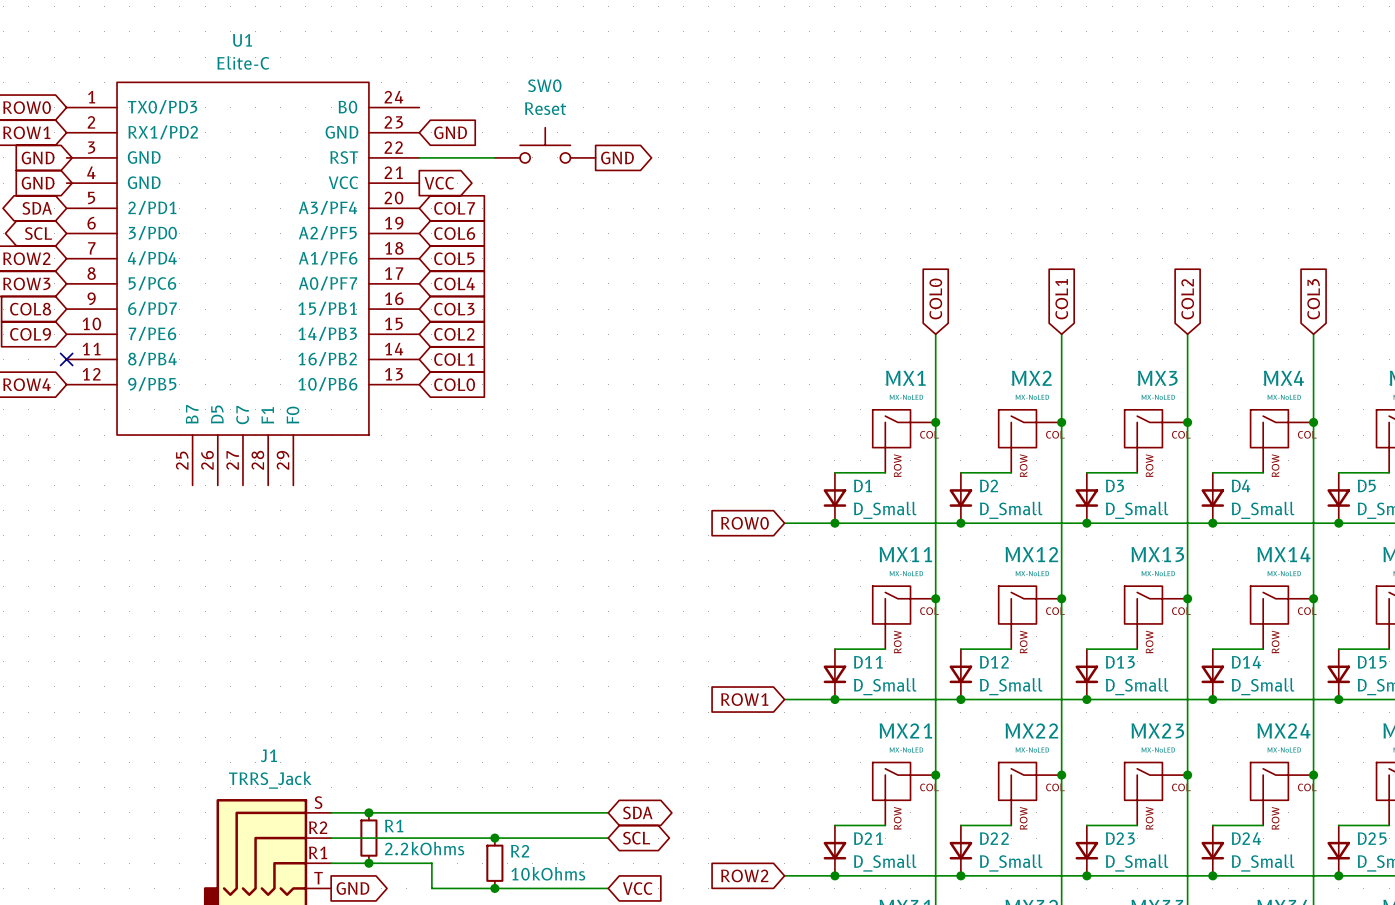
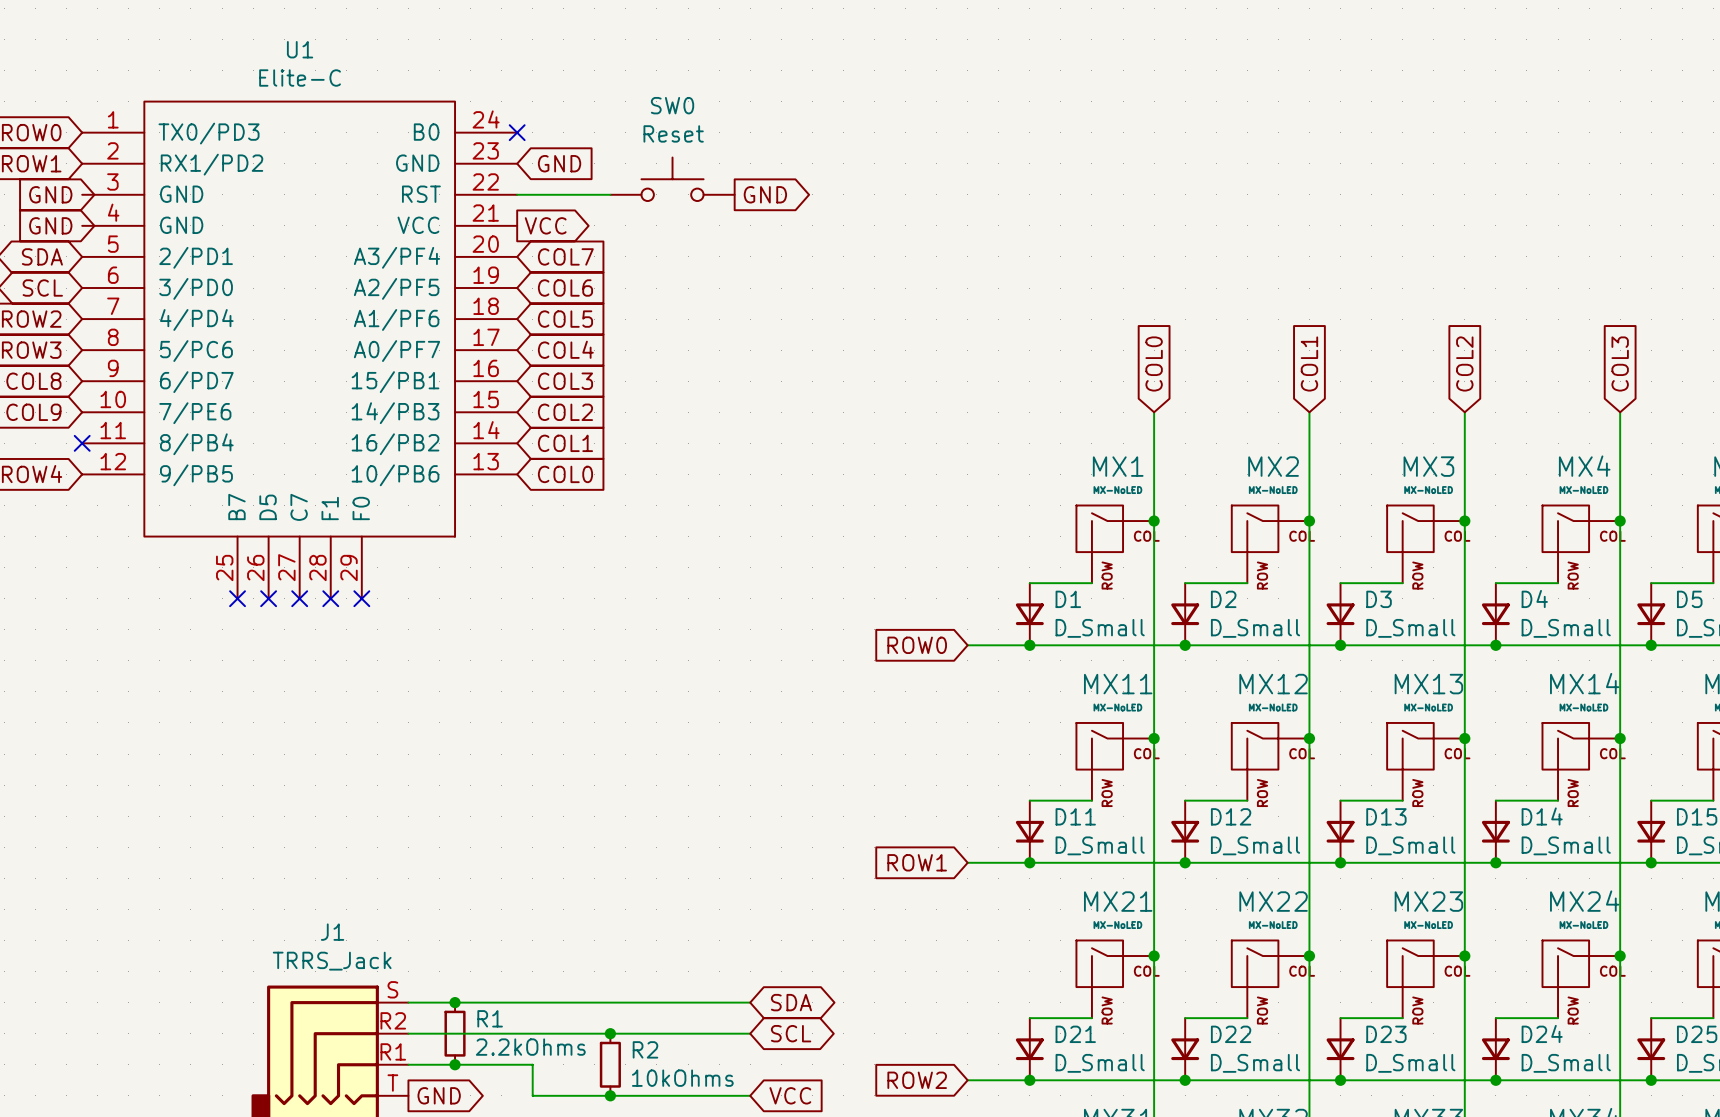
no-connect mark: none -> (517, 132)
no-connect mark: none -> (237, 598)
no-connect mark: none -> (268, 598)
no-connect mark: none -> (299, 598)
no-connect mark: none -> (330, 598)
no-connect mark: none -> (361, 598)

